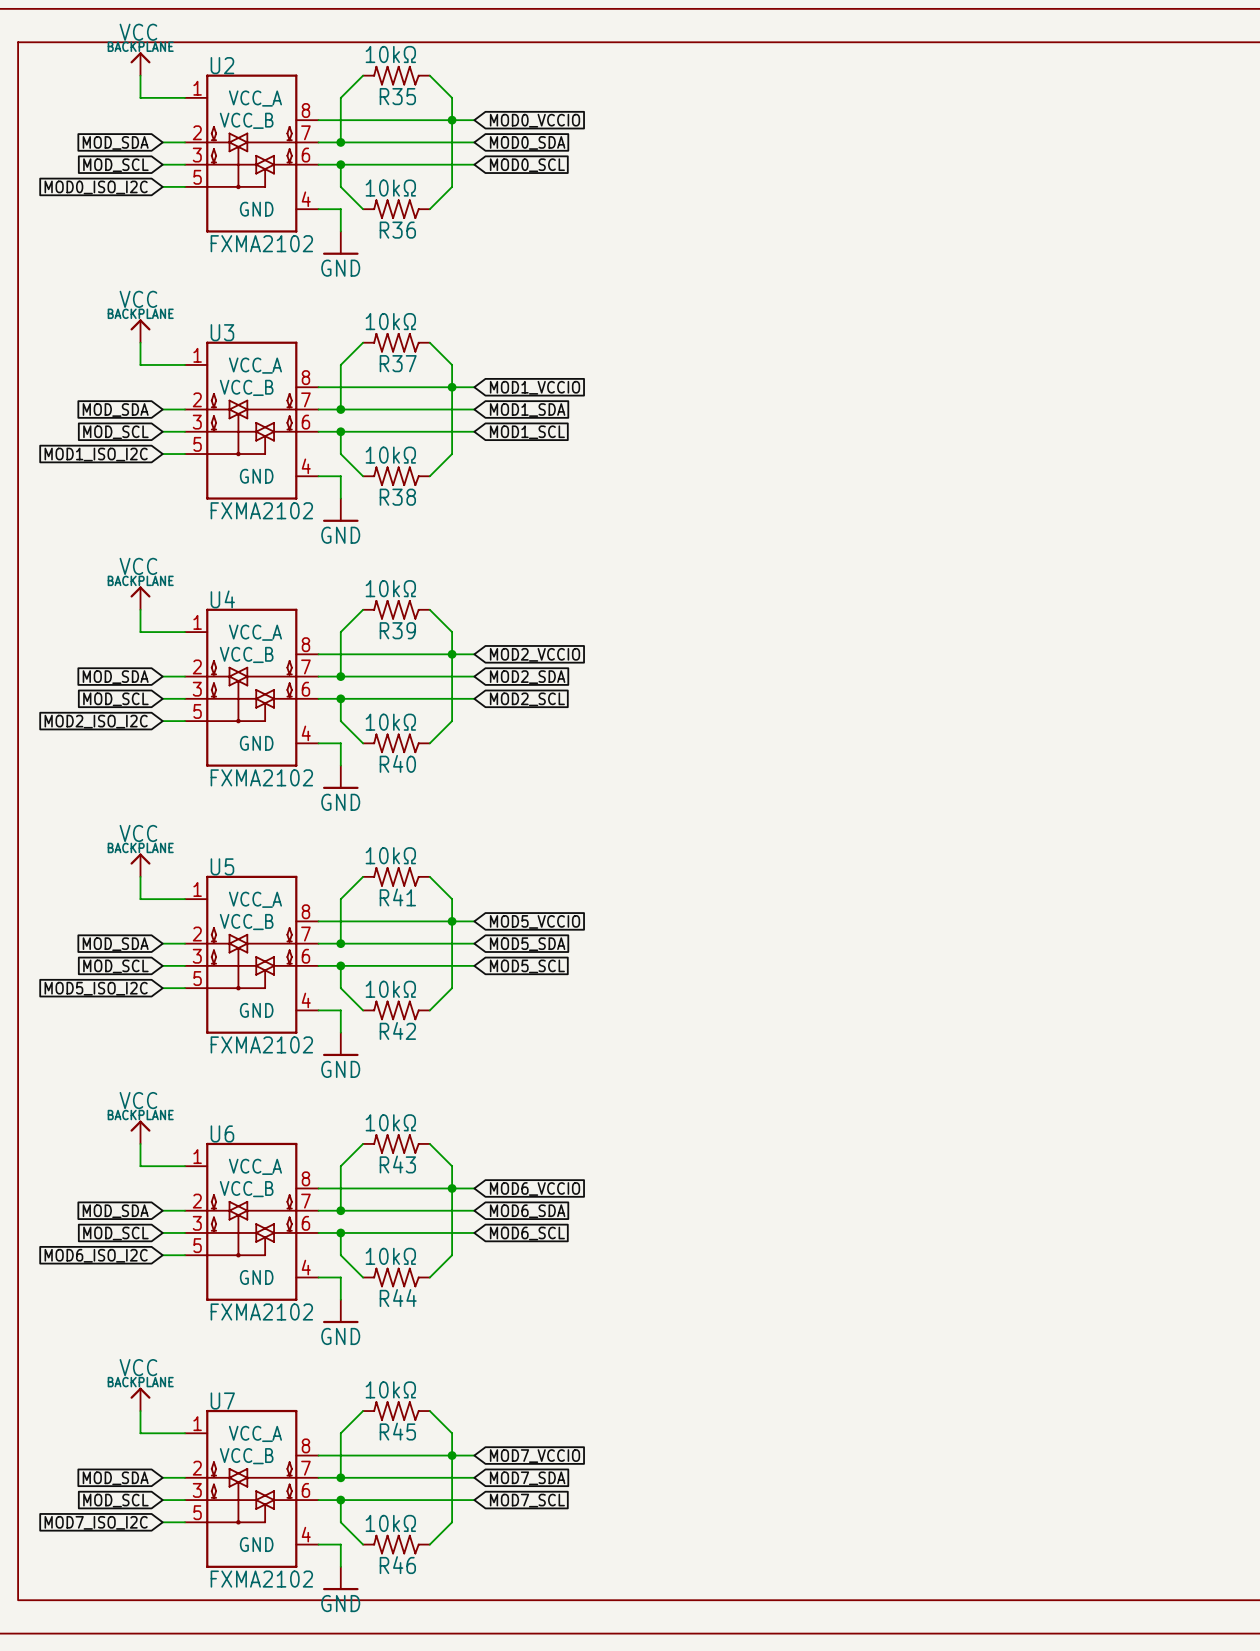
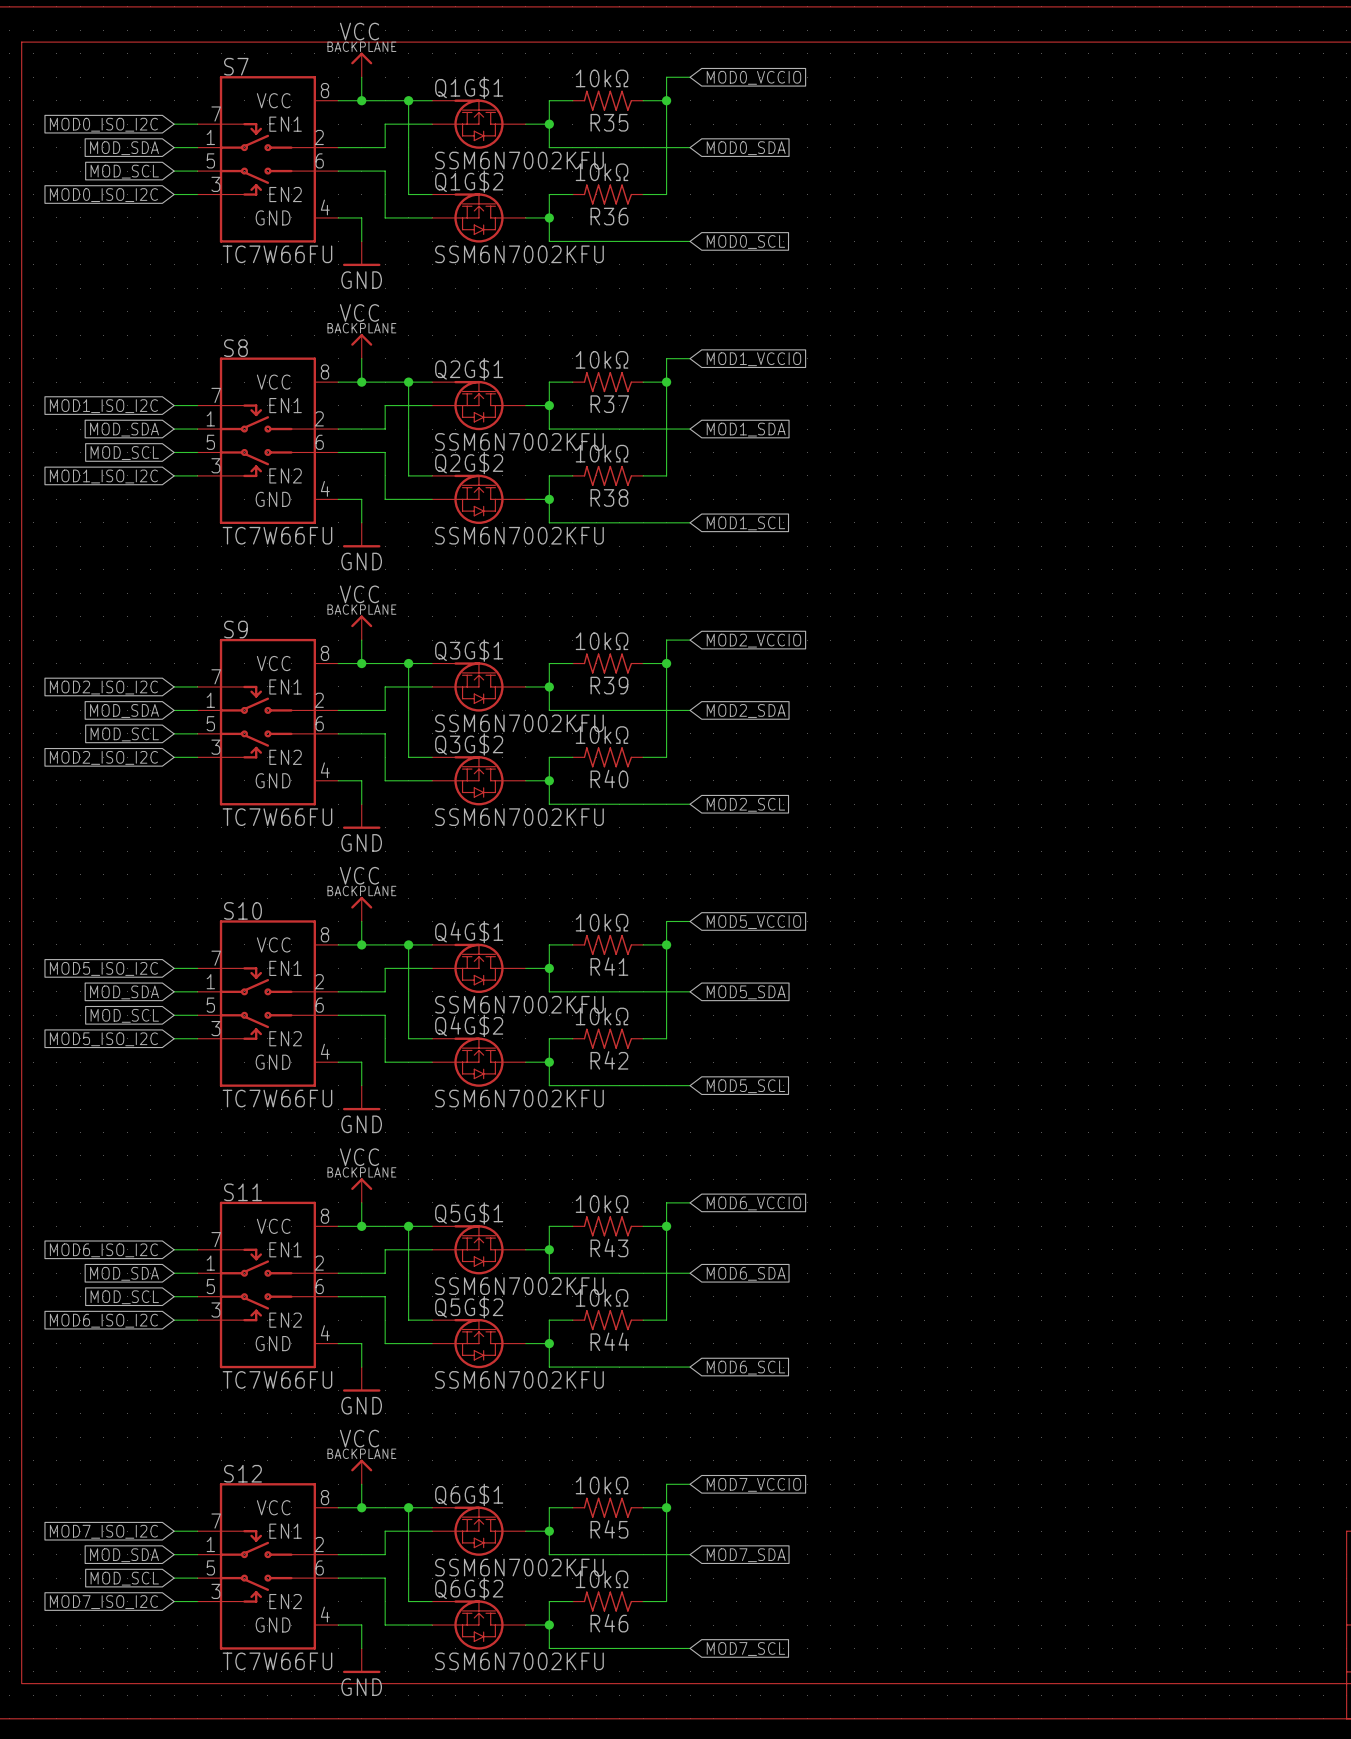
power symbol: (140, 63) -> none
power symbol: none -> (361, 64)
wire: (140, 75) (140, 97) (185, 97) -> none
wire: none -> (361, 77) (361, 100)
wire: (363, 75) (340, 97) (340, 142) -> none
R35 position: (396, 75) -> (607, 100)
wire: (429, 75) (452, 97) (452, 186) (429, 209) -> none
wire: none -> (690, 77) (666, 77) (666, 194) (643, 194)
wire: none -> (338, 100) (432, 100)
junction: none -> (361, 100)
wire: none -> (408, 100) (408, 194) (432, 194)
junction: none -> (408, 100)
wire: none -> (572, 100) (549, 100) (549, 147) (690, 147)
wire: none -> (643, 100) (666, 100)
junction: none -> (666, 100)
global label: none -> MOD0_ISO_I2C (103, 124)
wire: none -> (174, 124) (197, 124)
wire: (318, 120) (363, 120) -> (385, 147) (385, 124)
Q1G$1: none -> SSM6N7002KFU (478, 124)
junction: (452, 120) -> none
wire: none -> (525, 124) (549, 124)
junction: none -> (549, 124)
global label position: MOD0_VCCIO (535, 120) -> MOD0_VCCIO (753, 77)
junction: (340, 142) -> none
wire: (363, 142) (474, 142) -> none
global label position: MOD0_SDA (527, 142) -> MOD0_SDA (746, 148)
U2: FXMA2102 (251, 153) -> none
S7: none -> TC7W66FU (267, 159)
wire: (340, 164) (340, 186) (363, 209) -> none
junction: (340, 164) -> none
wire: (363, 164) (474, 164) -> (385, 171) (385, 217) (432, 217)
global label position: MOD0_SCL (527, 165) -> MOD0_SCL (745, 241)
wire: none -> (572, 194) (549, 194) (549, 241) (690, 241)
R36 position: (396, 209) -> (607, 194)
Q1G$2: none -> SSM6N7002KFU (478, 217)
wire: none -> (525, 217) (549, 217)
junction: none -> (549, 217)
power symbol: (140, 331) -> none
power symbol: none -> (361, 346)
wire: (140, 342) (140, 364) (185, 364) -> none
wire: none -> (361, 358) (361, 382)
wire: (363, 342) (340, 364) (340, 409) -> none
R37 position: (396, 342) -> (607, 382)
wire: (429, 342) (452, 364) (452, 454) (429, 476) -> none
wire: none -> (690, 358) (666, 358) (666, 475) (643, 475)
wire: none -> (338, 382) (432, 382)
junction: none -> (361, 382)
wire: none -> (408, 382) (408, 475) (432, 475)
junction: none -> (408, 382)
wire: none -> (572, 382) (549, 382) (549, 429) (690, 429)
wire: none -> (643, 382) (666, 382)
junction: none -> (666, 382)
global label: none -> MOD1_ISO_I2C (103, 406)
wire: none -> (174, 405) (197, 405)
wire: (318, 387) (363, 387) -> (385, 429) (385, 405)
Q2G$1: none -> SSM6N7002KFU (478, 405)
junction: (452, 387) -> none
wire: none -> (525, 405) (549, 405)
junction: none -> (549, 405)
global label position: MOD1_VCCIO (535, 387) -> MOD1_VCCIO (753, 359)
junction: (340, 409) -> none
wire: (363, 409) (474, 409) -> none
global label position: MOD1_SDA (527, 410) -> MOD1_SDA (746, 429)
U3: FXMA2102 (251, 420) -> none
S8: none -> TC7W66FU (267, 440)
wire: (340, 431) (340, 454) (363, 476) -> none
junction: (340, 431) -> none
wire: (363, 431) (474, 431) -> (385, 452) (385, 499) (432, 499)
global label position: MOD1_SCL (527, 432) -> MOD1_SCL (745, 523)
wire: none -> (572, 475) (549, 475) (549, 522) (690, 522)
R38 position: (396, 476) -> (607, 475)
Q2G$2: none -> SSM6N7002KFU (478, 499)
wire: none -> (525, 499) (549, 499)
junction: none -> (549, 499)
power symbol: (140, 598) -> none
power symbol: none -> (361, 627)
wire: (140, 609) (140, 632) (185, 632) -> none
wire: none -> (361, 640) (361, 663)
wire: (363, 609) (340, 632) (340, 676) -> none
R39 position: (396, 609) -> (607, 663)
wire: (429, 609) (452, 632) (452, 721) (429, 743) -> none
wire: none -> (690, 640) (666, 640) (666, 757) (643, 757)
wire: none -> (338, 663) (432, 663)
junction: none -> (361, 663)
wire: none -> (408, 663) (408, 757) (432, 757)
junction: none -> (408, 663)
wire: none -> (572, 663) (549, 663) (549, 710) (690, 710)
wire: none -> (643, 663) (666, 663)
junction: none -> (666, 663)
global label: none -> MOD2_ISO_I2C (103, 687)
wire: none -> (174, 686) (197, 686)
wire: (318, 654) (363, 654) -> (385, 710) (385, 686)
Q3G$1: none -> SSM6N7002KFU (478, 686)
junction: (452, 654) -> none
wire: none -> (525, 686) (549, 686)
junction: none -> (549, 686)
global label position: MOD2_VCCIO (535, 654) -> MOD2_VCCIO (753, 640)
junction: (340, 676) -> none
wire: (363, 676) (474, 676) -> none
global label position: MOD2_SDA (527, 677) -> MOD2_SDA (746, 710)
U4: FXMA2102 (251, 687) -> none
S9: none -> TC7W66FU (267, 722)
wire: (340, 698) (340, 721) (363, 743) -> none
junction: (340, 698) -> none
wire: (363, 698) (474, 698) -> (385, 733) (385, 780) (432, 780)
global label position: MOD2_SCL (527, 699) -> MOD2_SCL (745, 804)
wire: none -> (572, 757) (549, 757) (549, 804) (690, 804)
R40 position: (396, 743) -> (607, 757)
Q3G$2: none -> SSM6N7002KFU (478, 780)
wire: none -> (525, 780) (549, 780)
junction: none -> (549, 780)
power symbol: (140, 865) -> none
power symbol: none -> (361, 909)
wire: (140, 876) (140, 899) (185, 899) -> none
wire: none -> (361, 921) (361, 944)
wire: (363, 876) (340, 899) (340, 943) -> none
R41 position: (396, 876) -> (607, 944)
wire: (429, 876) (452, 899) (452, 988) (429, 1010) -> none
wire: none -> (690, 921) (666, 921) (666, 1038) (643, 1038)
wire: none -> (338, 944) (432, 944)
junction: none -> (361, 944)
wire: none -> (408, 944) (408, 1038) (432, 1038)
junction: none -> (408, 944)
wire: none -> (572, 944) (549, 944) (549, 991) (690, 991)
wire: none -> (643, 944) (666, 944)
junction: none -> (666, 944)
global label: none -> MOD5_ISO_I2C (103, 968)
wire: none -> (174, 968) (197, 968)
wire: (318, 921) (363, 921) -> (385, 991) (385, 968)
Q4G$1: none -> SSM6N7002KFU (478, 968)
junction: (452, 921) -> none
wire: none -> (525, 968) (549, 968)
junction: none -> (549, 968)
global label position: MOD5_VCCIO (535, 921) -> MOD5_VCCIO (753, 922)
junction: (340, 943) -> none
wire: (363, 943) (474, 943) -> none
global label position: MOD5_SDA (527, 944) -> MOD5_SDA (746, 992)
U5: FXMA2102 (251, 954) -> none
S10: none -> TC7W66FU (267, 1003)
wire: (340, 965) (340, 988) (363, 1010) -> none
junction: (340, 965) -> none
wire: (363, 965) (474, 965) -> (385, 1015) (385, 1062) (432, 1062)
global label position: MOD5_SCL (527, 966) -> MOD5_SCL (745, 1086)
wire: none -> (572, 1038) (549, 1038) (549, 1085) (690, 1085)
R42 position: (396, 1010) -> (607, 1038)
Q4G$2: none -> SSM6N7002KFU (478, 1062)
wire: none -> (525, 1062) (549, 1062)
junction: none -> (549, 1062)
power symbol: (140, 1132) -> none
power symbol: none -> (361, 1190)
wire: (140, 1143) (140, 1166) (185, 1166) -> none
wire: none -> (361, 1202) (361, 1226)
wire: (363, 1143) (340, 1166) (340, 1210) -> none
R43 position: (396, 1143) -> (607, 1226)
wire: (429, 1143) (452, 1166) (452, 1255) (429, 1277) -> none
wire: none -> (690, 1202) (666, 1202) (666, 1320) (643, 1320)
wire: none -> (338, 1226) (432, 1226)
junction: none -> (361, 1226)
wire: none -> (408, 1226) (408, 1320) (432, 1320)
junction: none -> (408, 1226)
wire: none -> (572, 1226) (549, 1226) (549, 1273) (690, 1273)
wire: none -> (643, 1226) (666, 1226)
junction: none -> (666, 1226)
wire: none -> (174, 1249) (197, 1249)
wire: (318, 1188) (363, 1188) -> (385, 1273) (385, 1249)
Q5G$1: none -> SSM6N7002KFU (478, 1249)
junction: (452, 1188) -> none
wire: none -> (525, 1249) (549, 1249)
junction: none -> (549, 1249)
global label: none -> MOD6_ISO_I2C (103, 1250)
global label position: MOD6_VCCIO (535, 1189) -> MOD6_VCCIO (753, 1203)
junction: (340, 1210) -> none
wire: (363, 1210) (474, 1210) -> none
global label position: MOD6_SDA (527, 1211) -> MOD6_SDA (746, 1273)
U6: FXMA2102 (251, 1221) -> none
S11: none -> TC7W66FU (267, 1284)
wire: (340, 1232) (340, 1255) (363, 1277) -> none
junction: (340, 1232) -> none
wire: (363, 1232) (474, 1232) -> (385, 1296) (385, 1343) (432, 1343)
global label position: MOD6_SCL (527, 1233) -> MOD6_SCL (745, 1367)
wire: none -> (572, 1320) (549, 1320) (549, 1367) (690, 1367)
R44 position: (396, 1277) -> (607, 1320)
Q5G$2: none -> SSM6N7002KFU (478, 1343)
wire: none -> (525, 1343) (549, 1343)
junction: none -> (549, 1343)
power symbol: (140, 1399) -> none
power symbol: none -> (361, 1471)
wire: (140, 1411) (140, 1433) (185, 1433) -> none
wire: none -> (361, 1484) (361, 1507)
wire: (363, 1411) (340, 1433) (340, 1477) -> none
R45 position: (396, 1411) -> (607, 1507)
wire: (429, 1411) (452, 1433) (452, 1522) (429, 1544) -> none
wire: none -> (690, 1484) (666, 1484) (666, 1601) (643, 1601)
wire: none -> (338, 1507) (432, 1507)
junction: none -> (361, 1507)
wire: none -> (408, 1507) (408, 1601) (432, 1601)
junction: none -> (408, 1507)
wire: none -> (572, 1507) (549, 1507) (549, 1554) (690, 1554)
wire: none -> (643, 1507) (666, 1507)
junction: none -> (666, 1507)
wire: none -> (174, 1531) (197, 1531)
wire: (318, 1455) (363, 1455) -> (385, 1554) (385, 1531)
Q6G$1: none -> SSM6N7002KFU (478, 1531)
junction: (452, 1455) -> none
wire: none -> (525, 1531) (549, 1531)
junction: none -> (549, 1531)
global label: none -> MOD7_ISO_I2C (103, 1531)
global label position: MOD7_VCCIO (535, 1456) -> MOD7_VCCIO (753, 1484)
junction: (340, 1477) -> none
wire: (363, 1477) (474, 1477) -> none
global label position: MOD7_SDA (527, 1478) -> MOD7_SDA (746, 1555)
U7: FXMA2102 (251, 1488) -> none
S12: none -> TC7W66FU (267, 1566)
wire: (340, 1500) (340, 1522) (363, 1544) -> none
junction: (340, 1500) -> none
wire: (363, 1500) (474, 1500) -> (385, 1578) (385, 1625) (432, 1625)
global label position: MOD7_SCL (527, 1500) -> MOD7_SCL (745, 1649)
wire: none -> (572, 1601) (549, 1601) (549, 1648) (690, 1648)
R46 position: (396, 1544) -> (607, 1601)
Q6G$2: none -> SSM6N7002KFU (478, 1625)
wire: none -> (525, 1625) (549, 1625)
junction: none -> (549, 1625)

